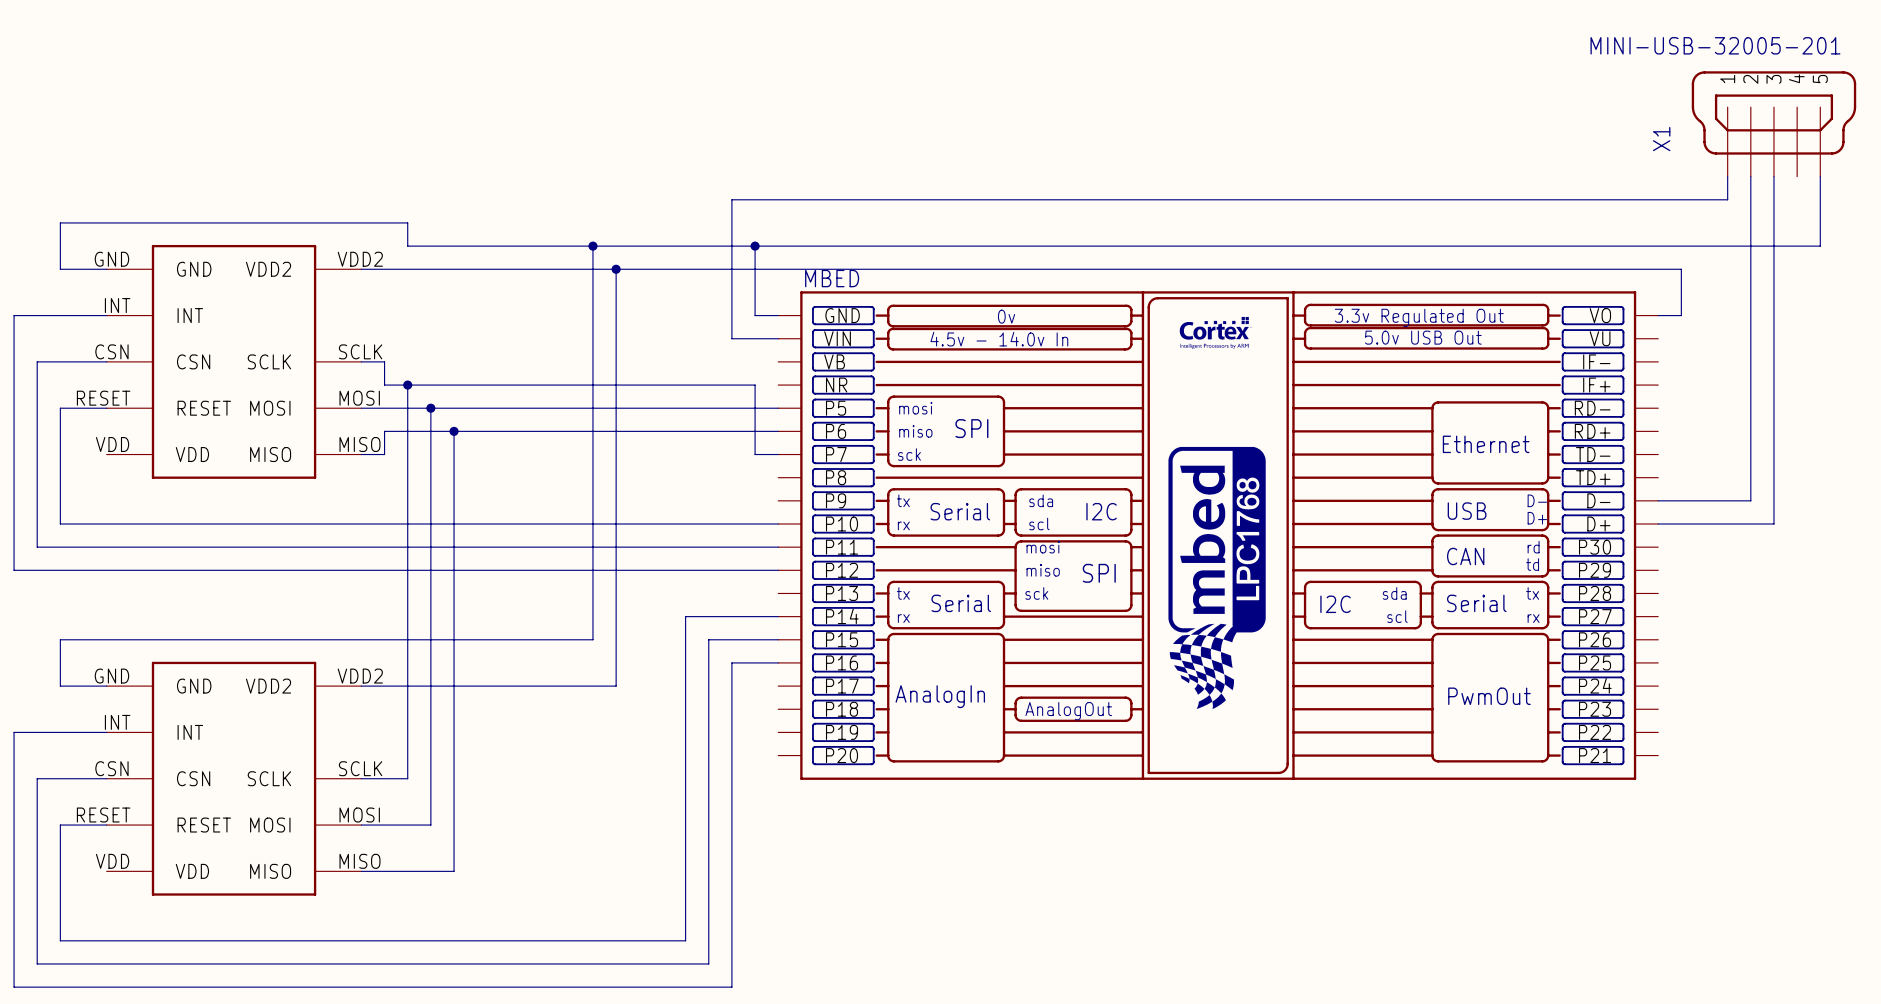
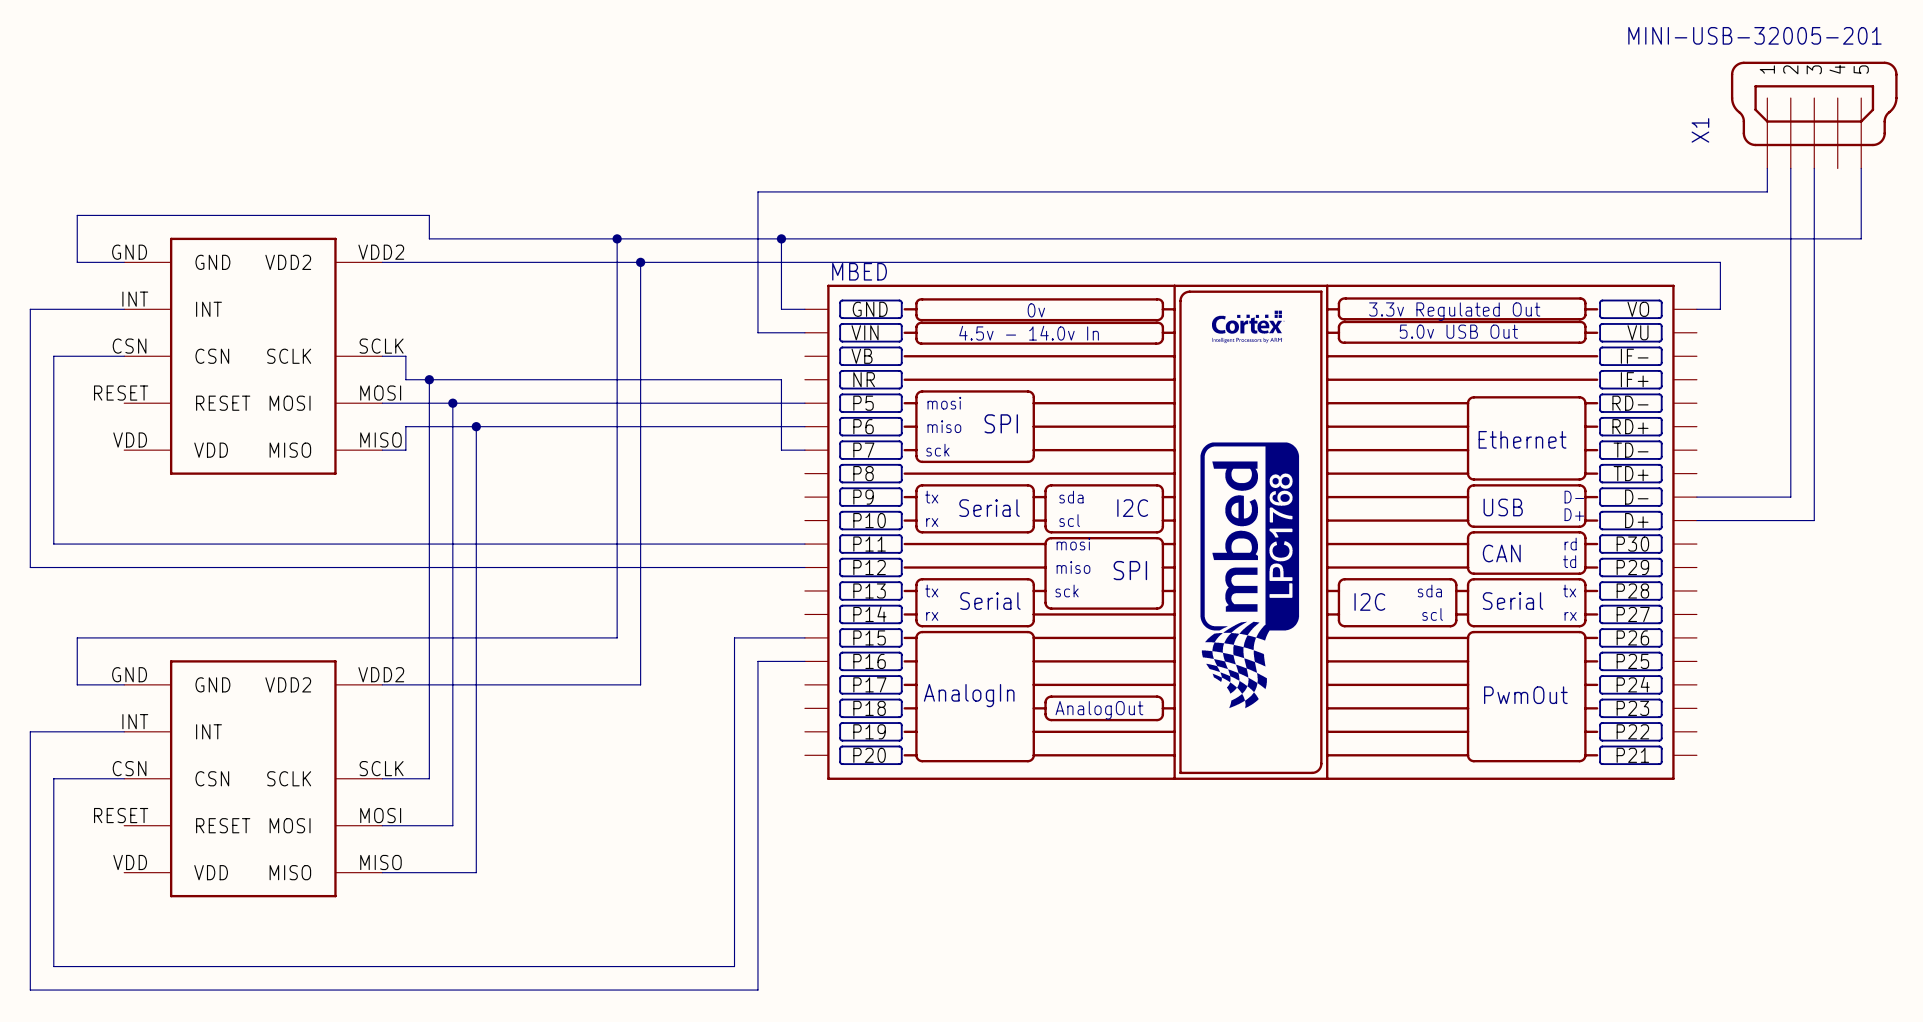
wire: (106, 408) (60, 408) (60, 524) (778, 524) -> none
wire: (778, 616) (685, 616) (685, 940) (60, 940) (60, 825) (106, 825) -> none

